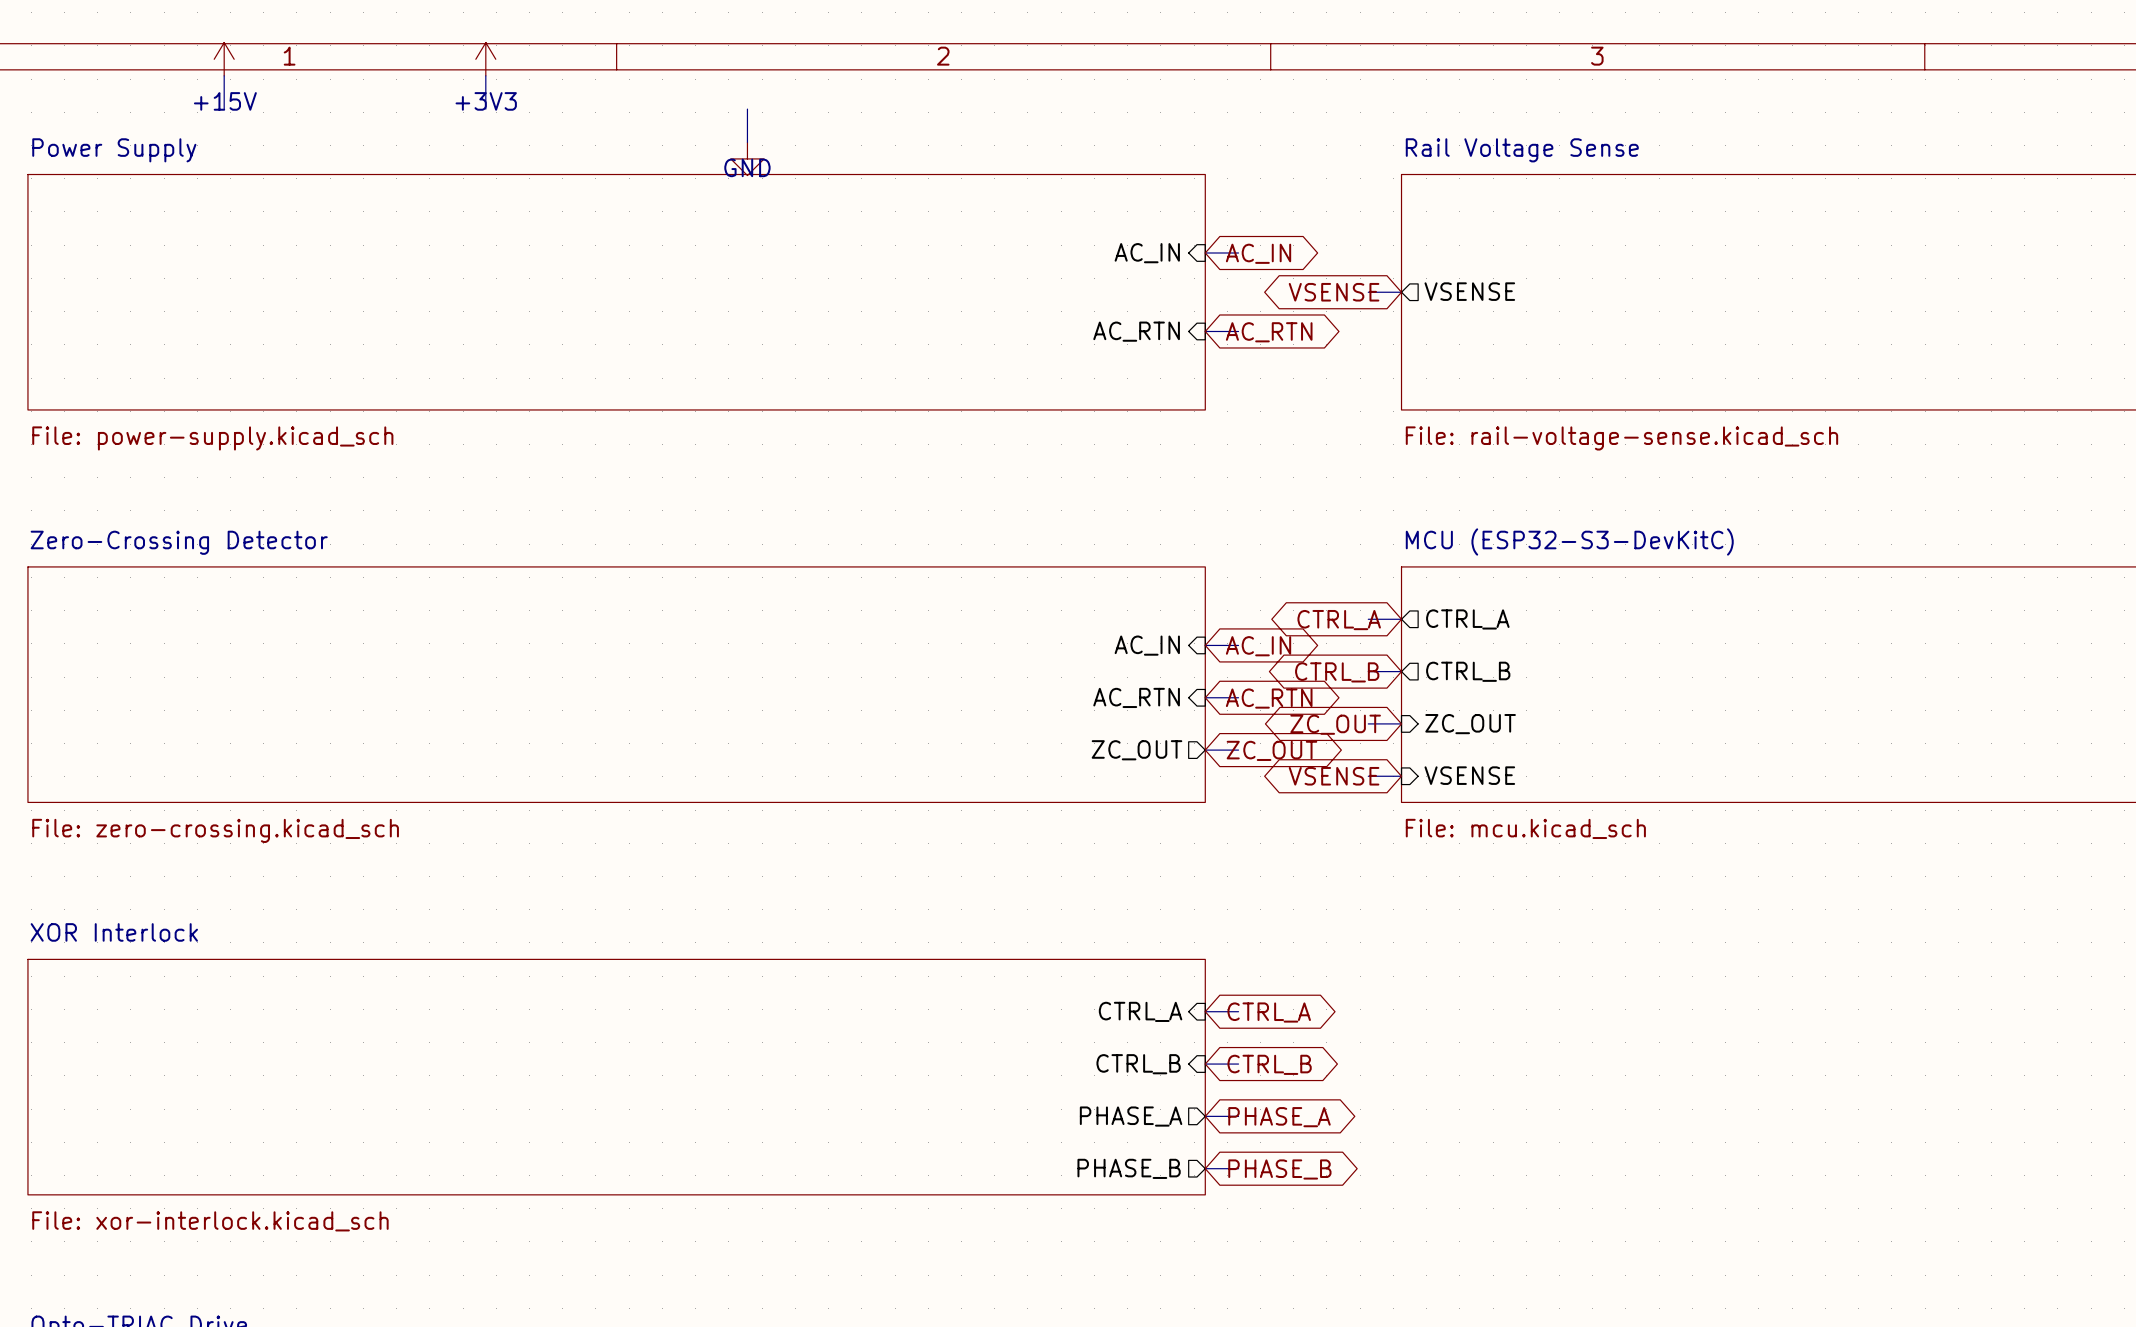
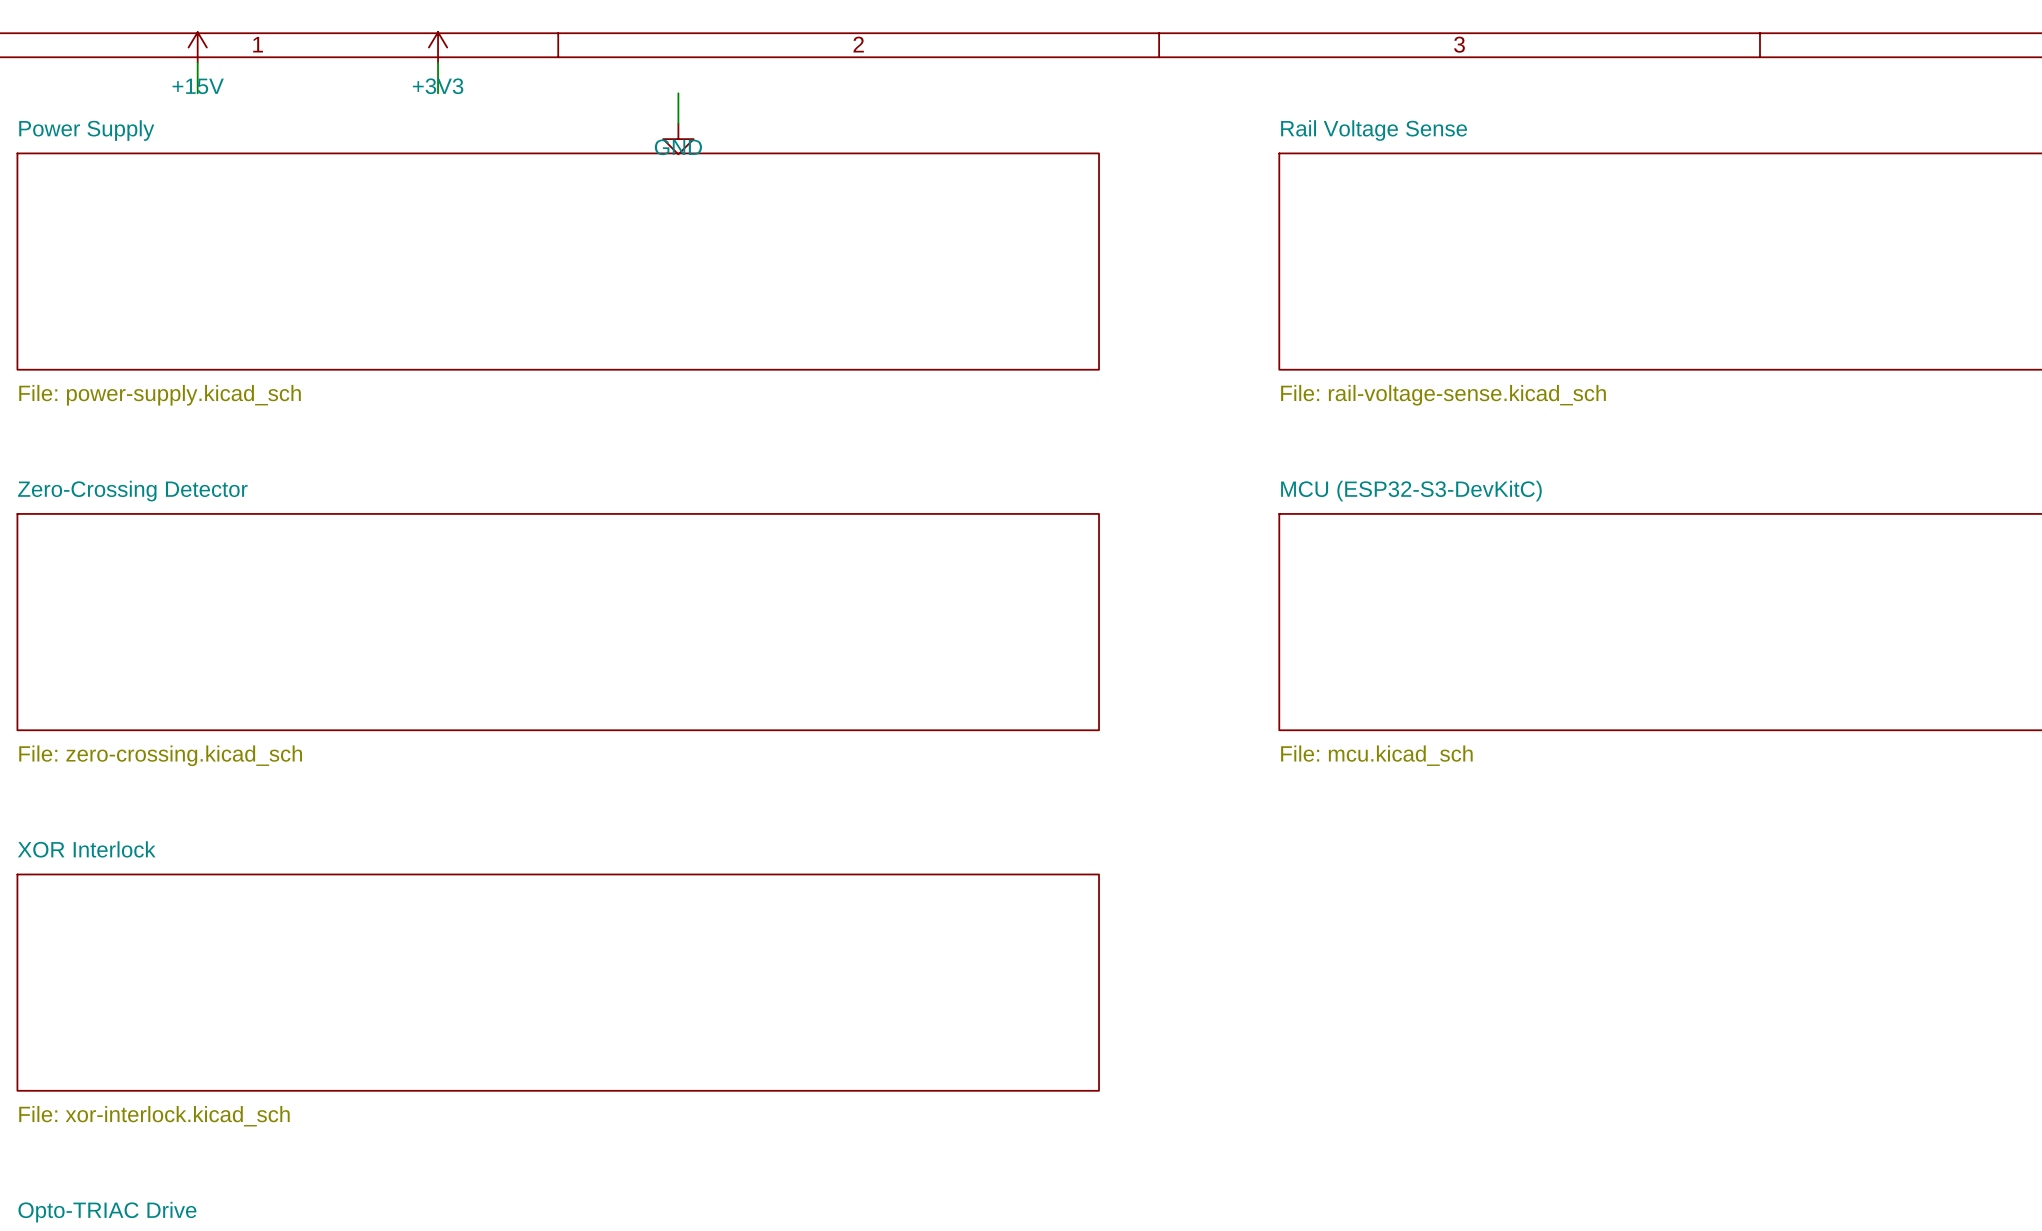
sheet pin: AC_IN (1147, 253) -> none
wire: (1205, 253) (1238, 253) -> none
global label: AC_IN (1258, 253) -> none
sheet pin: VSENSE (1469, 291) -> none
global label: VSENSE (1334, 292) -> none
wire: (1368, 292) (1401, 292) -> none
sheet pin: AC_RTN (1136, 331) -> none
wire: (1205, 331) (1238, 331) -> none
global label: AC_RTN (1269, 332) -> none
wire: (1368, 619) (1401, 619) -> none
sheet pin: CTRL_A (1467, 619) -> none
global label: CTRL_A (1339, 620) -> none
sheet pin: AC_IN (1147, 645) -> none
wire: (1205, 645) (1238, 645) -> none
global label: AC_IN (1258, 646) -> none
wire: (1368, 671) (1401, 671) -> none
sheet pin: CTRL_B (1468, 671) -> none
global label: CTRL_B (1337, 672) -> none
sheet pin: AC_RTN (1136, 697) -> none
wire: (1205, 697) (1238, 697) -> none
global label: AC_RTN (1269, 698) -> none
wire: (1368, 723) (1401, 723) -> none
global label: ZC_OUT (1335, 724) -> none
sheet pin: ZC_OUT (1470, 724) -> none
sheet pin: ZC_OUT (1137, 750) -> none
wire: (1205, 750) (1238, 750) -> none
global label: ZC_OUT (1271, 750) -> none
sheet pin: VSENSE (1469, 775) -> none
global label: VSENSE (1334, 776) -> none
wire: (1368, 776) (1401, 776) -> none
sheet pin: CTRL_A (1140, 1011) -> none
wire: (1205, 1011) (1238, 1011) -> none
global label: CTRL_A (1269, 1012) -> none
sheet pin: CTRL_B (1138, 1064) -> none
wire: (1205, 1064) (1238, 1064) -> none
global label: CTRL_B (1269, 1064) -> none
sheet pin: PHASE_A (1131, 1116) -> none
wire: (1205, 1116) (1238, 1116) -> none
global label: PHASE_A (1279, 1117) -> none
sheet pin: PHASE_B (1129, 1168) -> none
wire: (1205, 1168) (1238, 1168) -> none
global label: PHASE_B (1279, 1169) -> none

